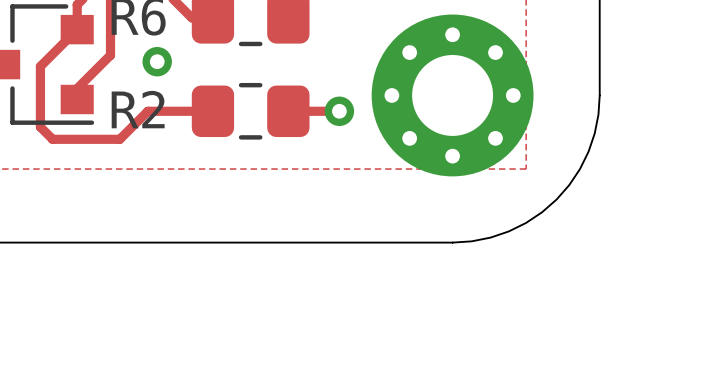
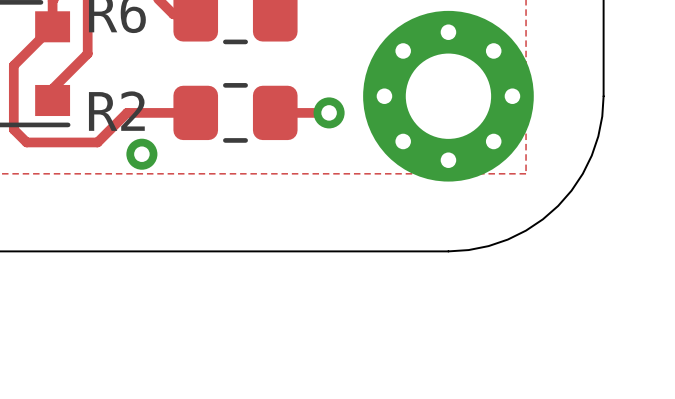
via position: (157, 61) -> (141, 154)

